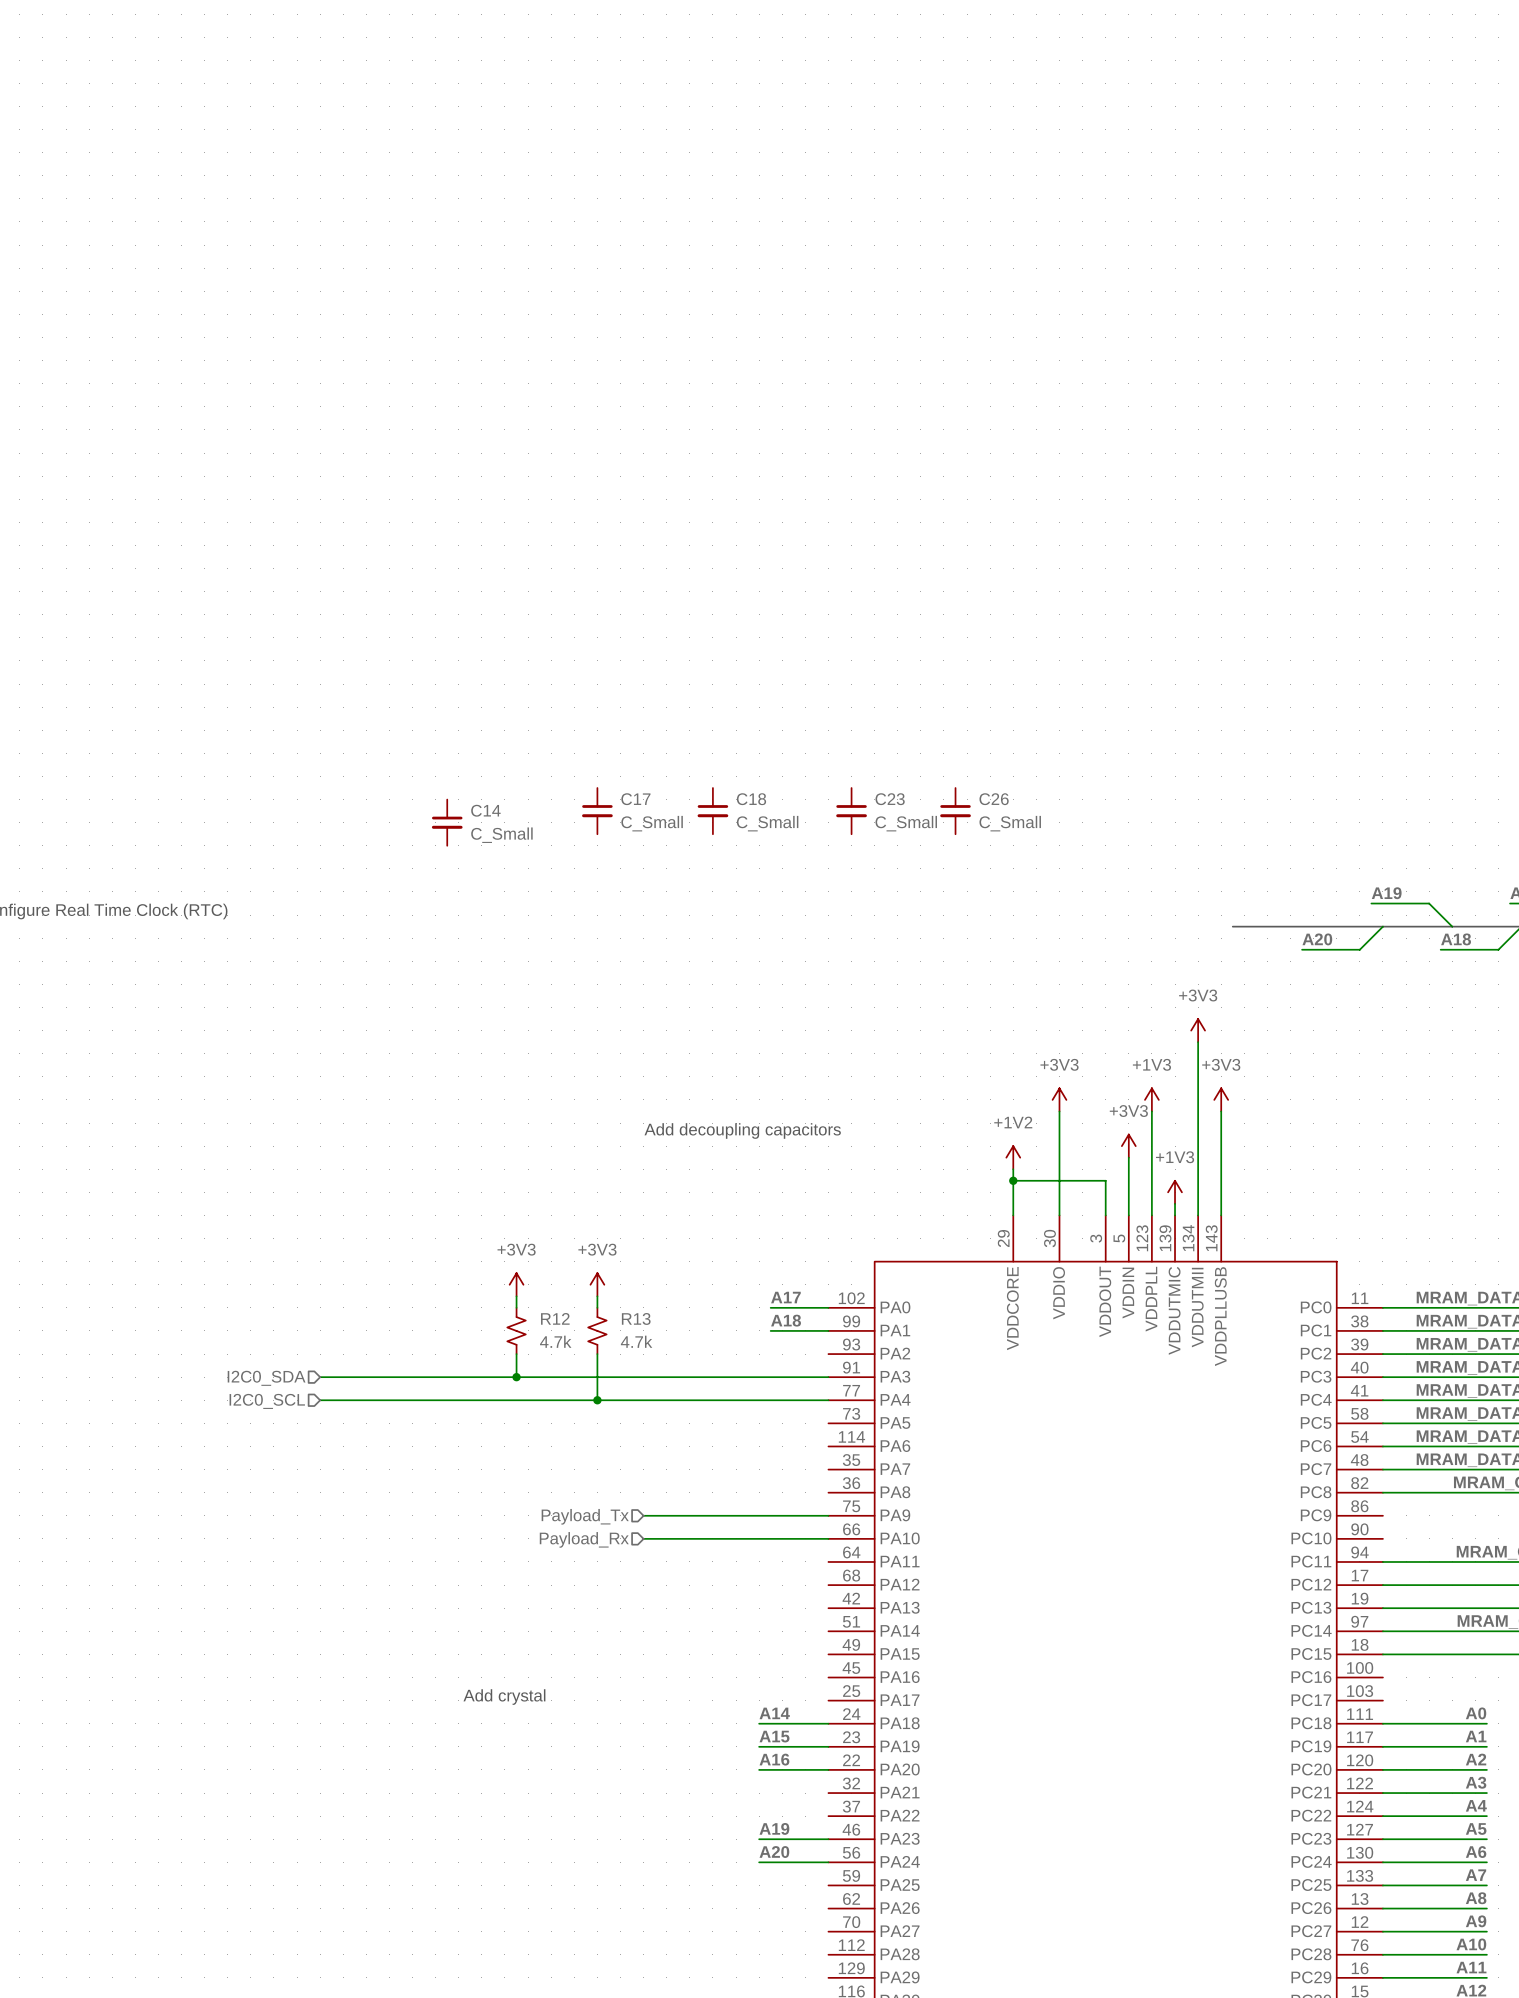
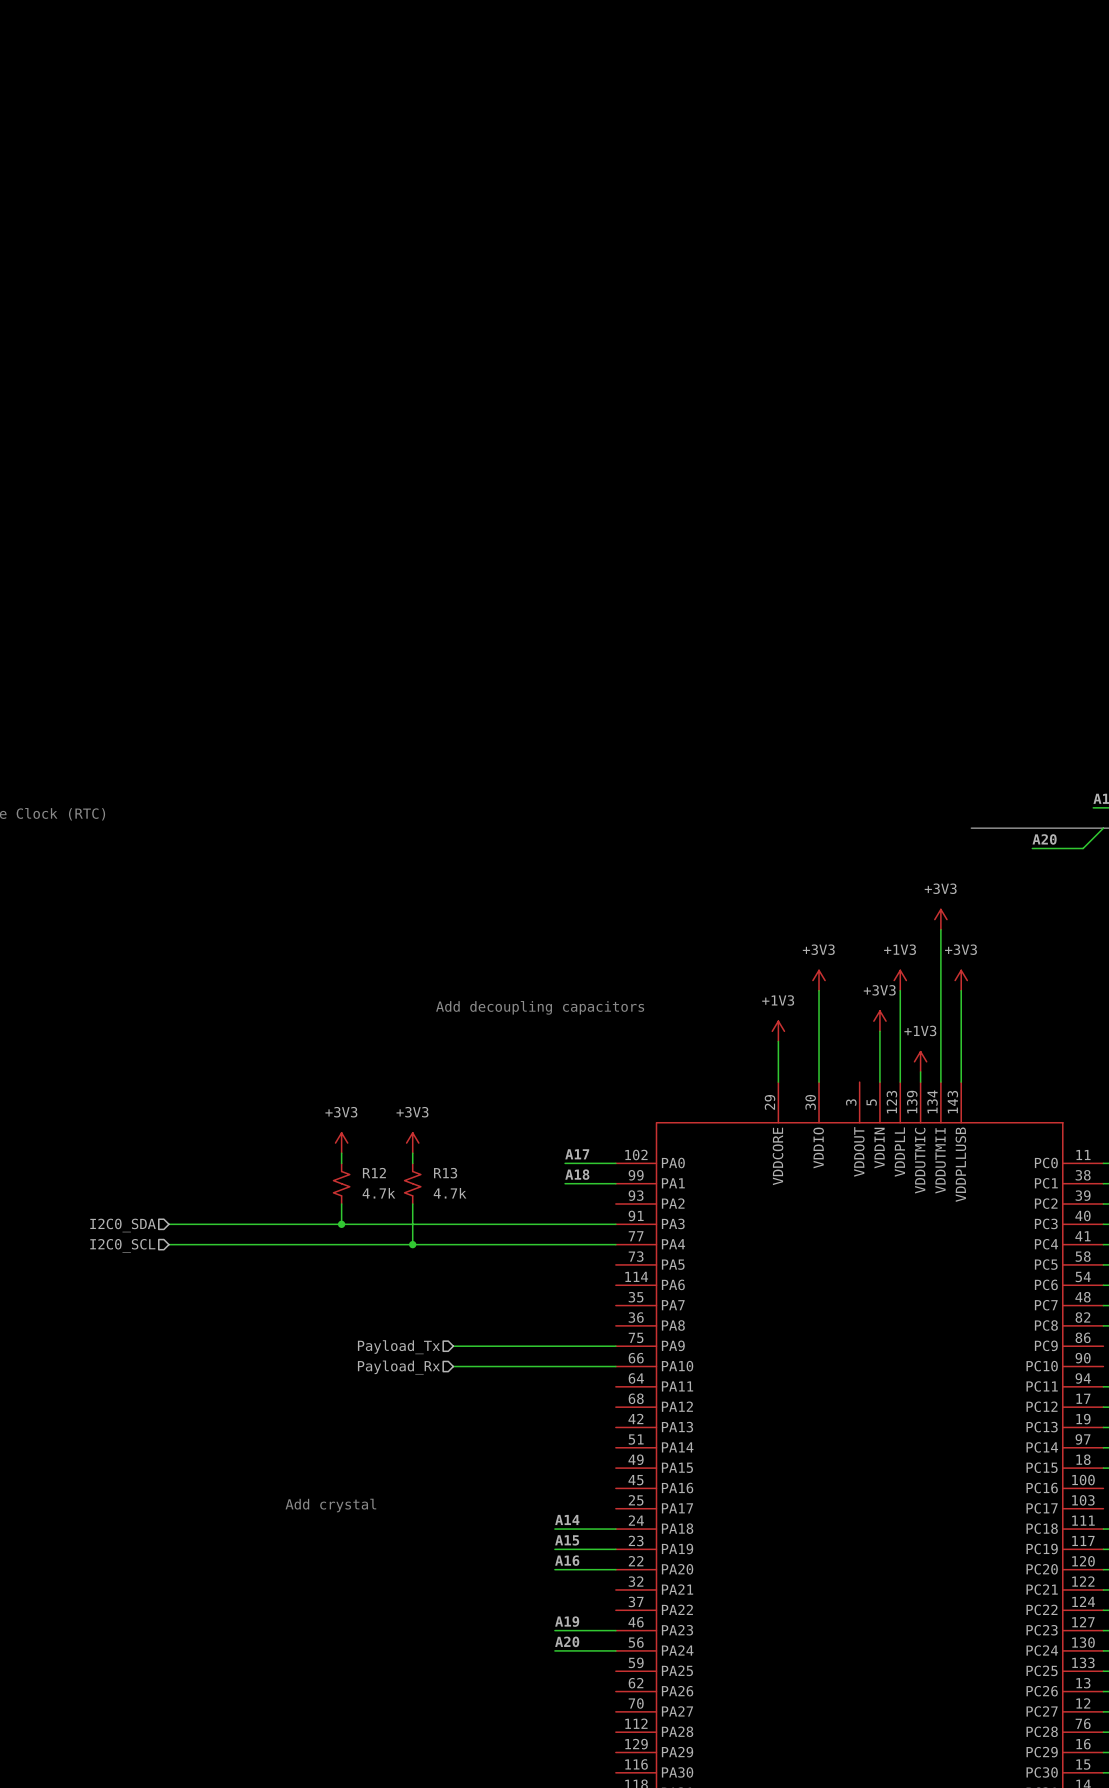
C17: C_Small (597, 811) -> none
C18: C_Small (712, 811) -> none
C23: C_Small (851, 811) -> none
C26: C_Small (955, 811) -> none
C14: C_Small (447, 822) -> none
power symbol: +1V2 (1013, 1157) -> +1V3 (778, 1031)
wire: (1013, 1180) (1105, 1180) (1105, 1215) -> none
junction: (1013, 1180) -> none

